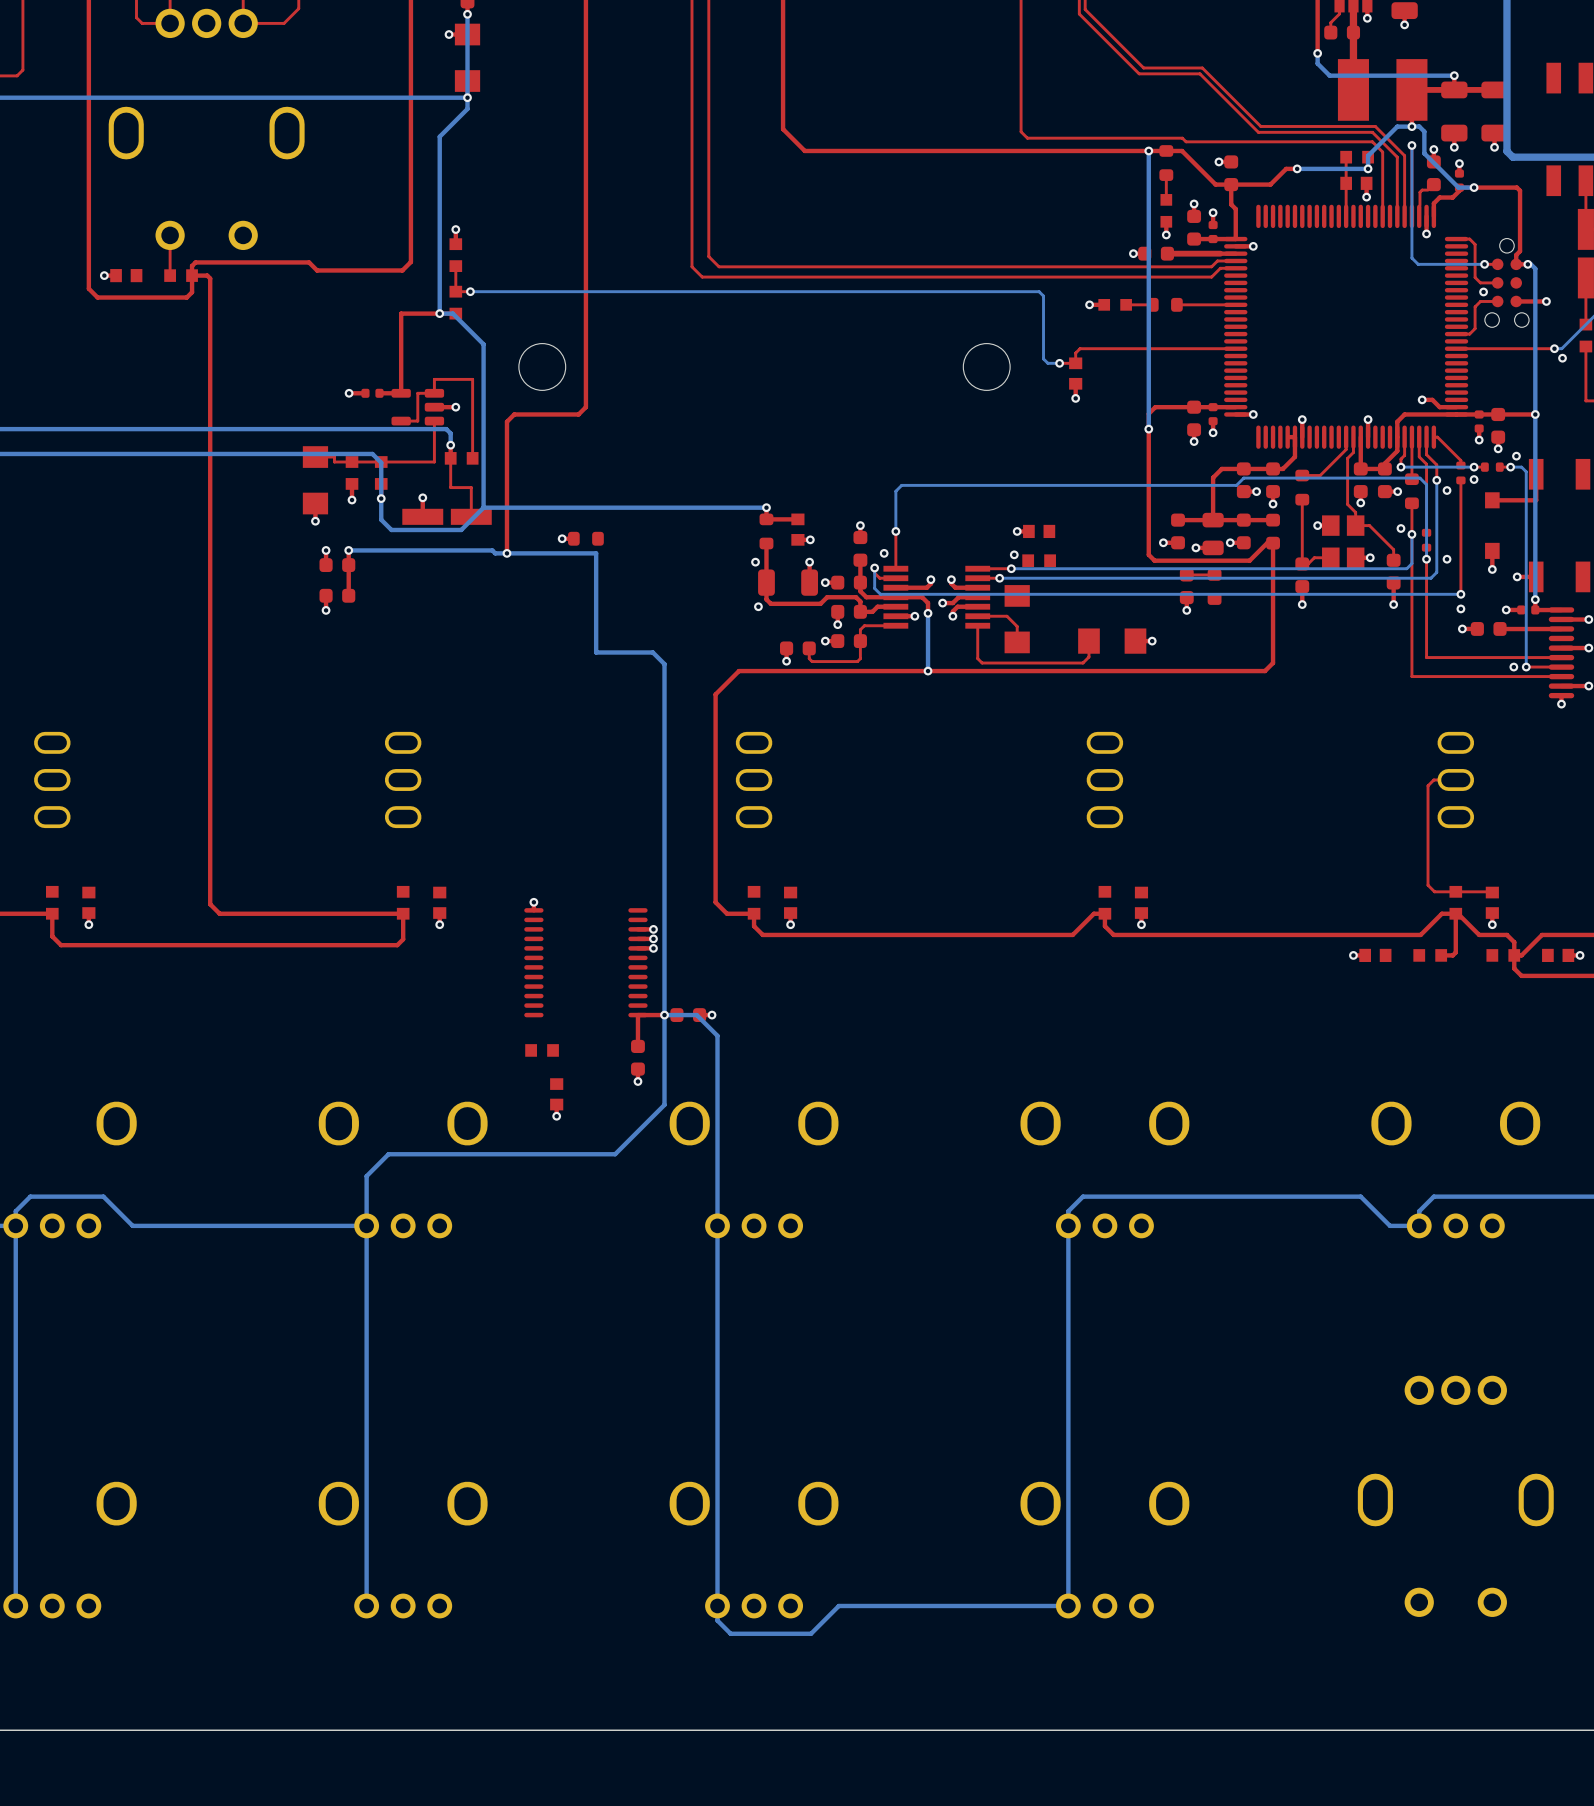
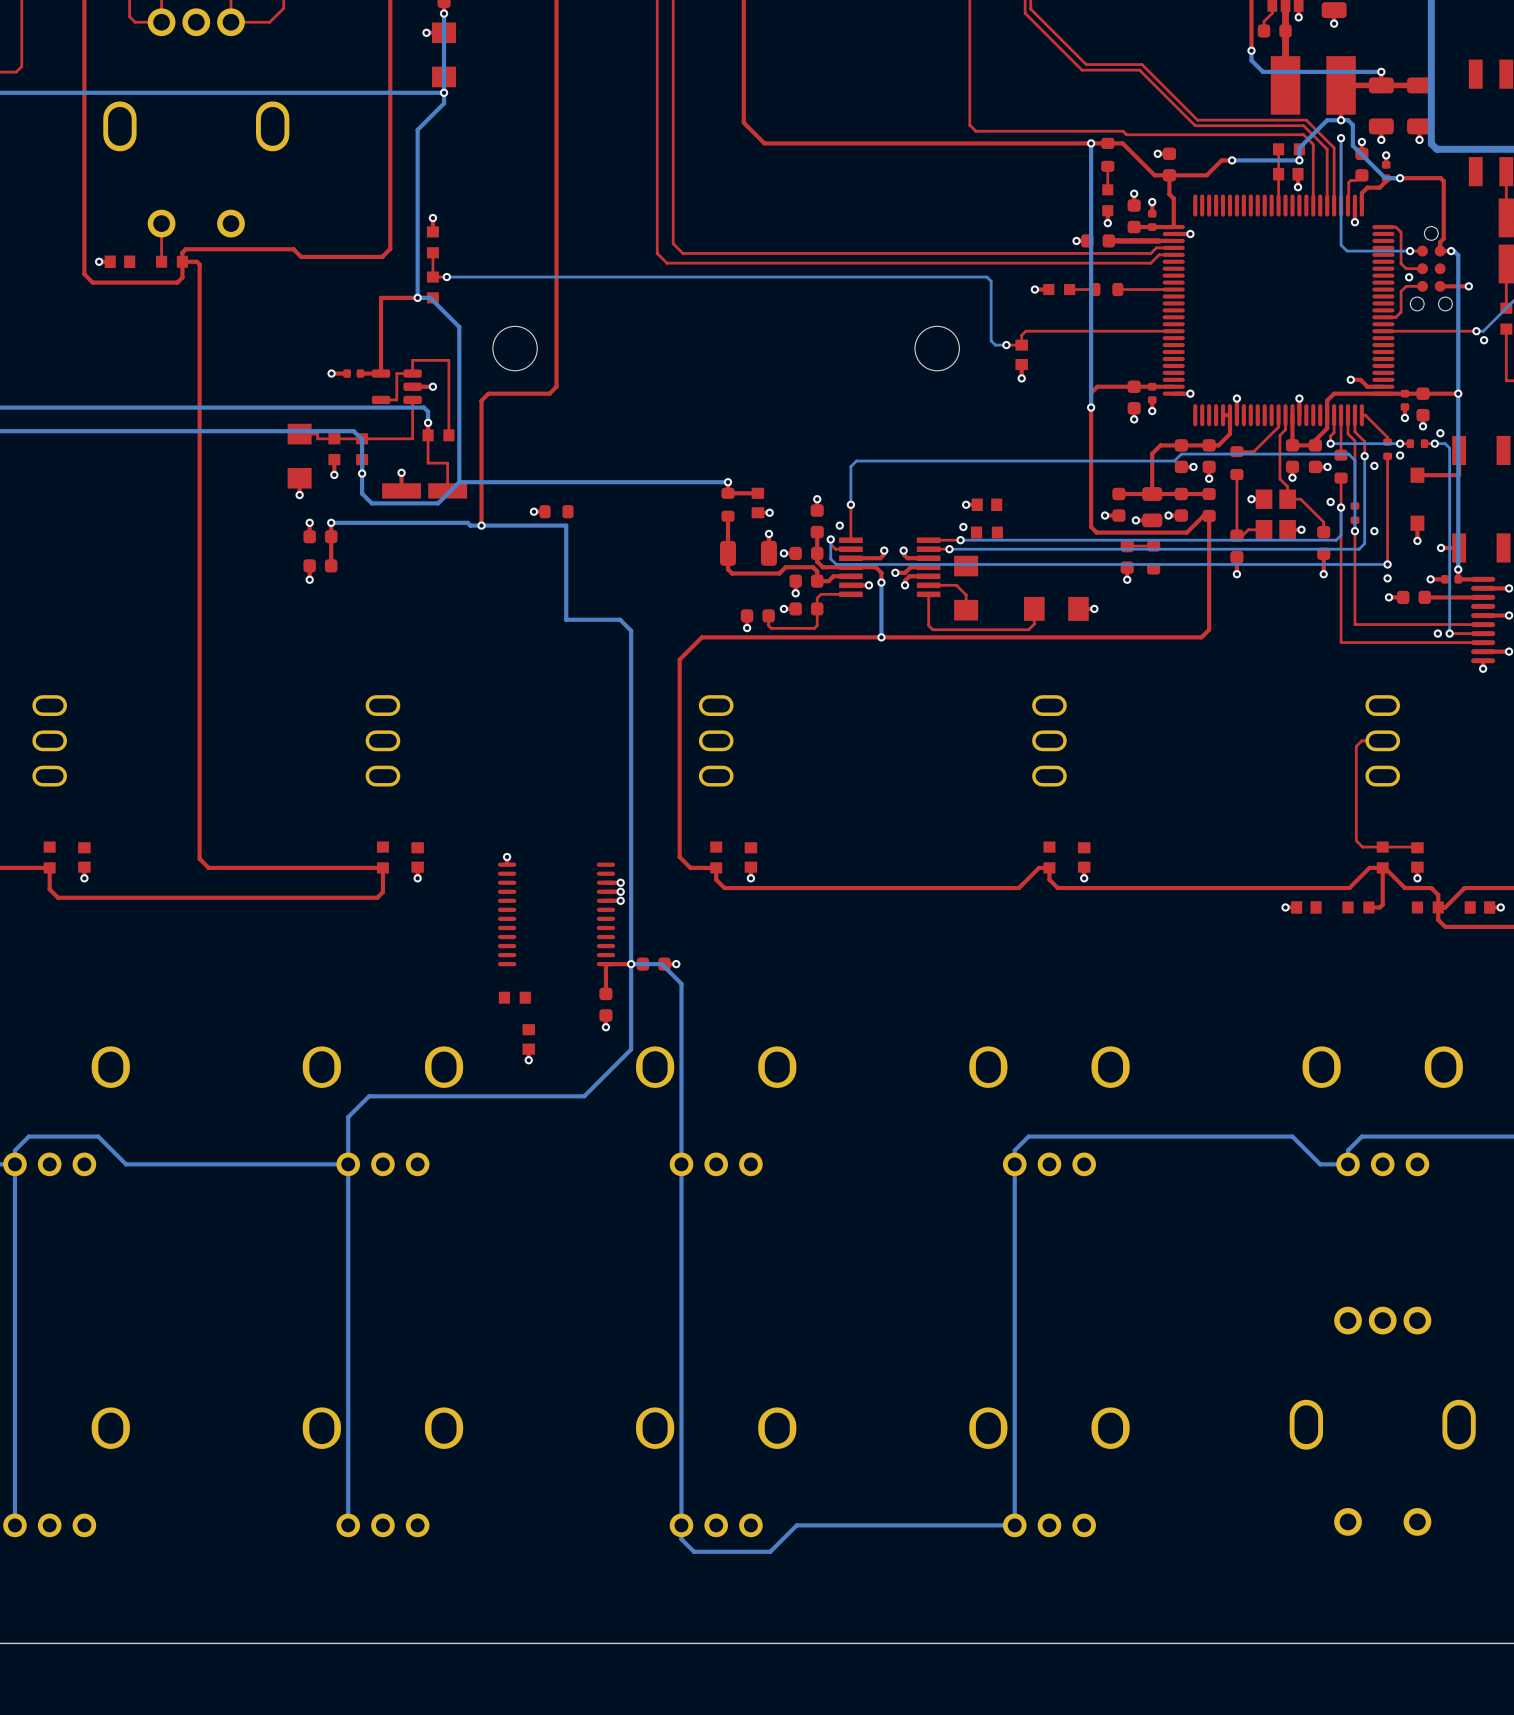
via: (755, 562) -> none
via: (758, 606) -> none

